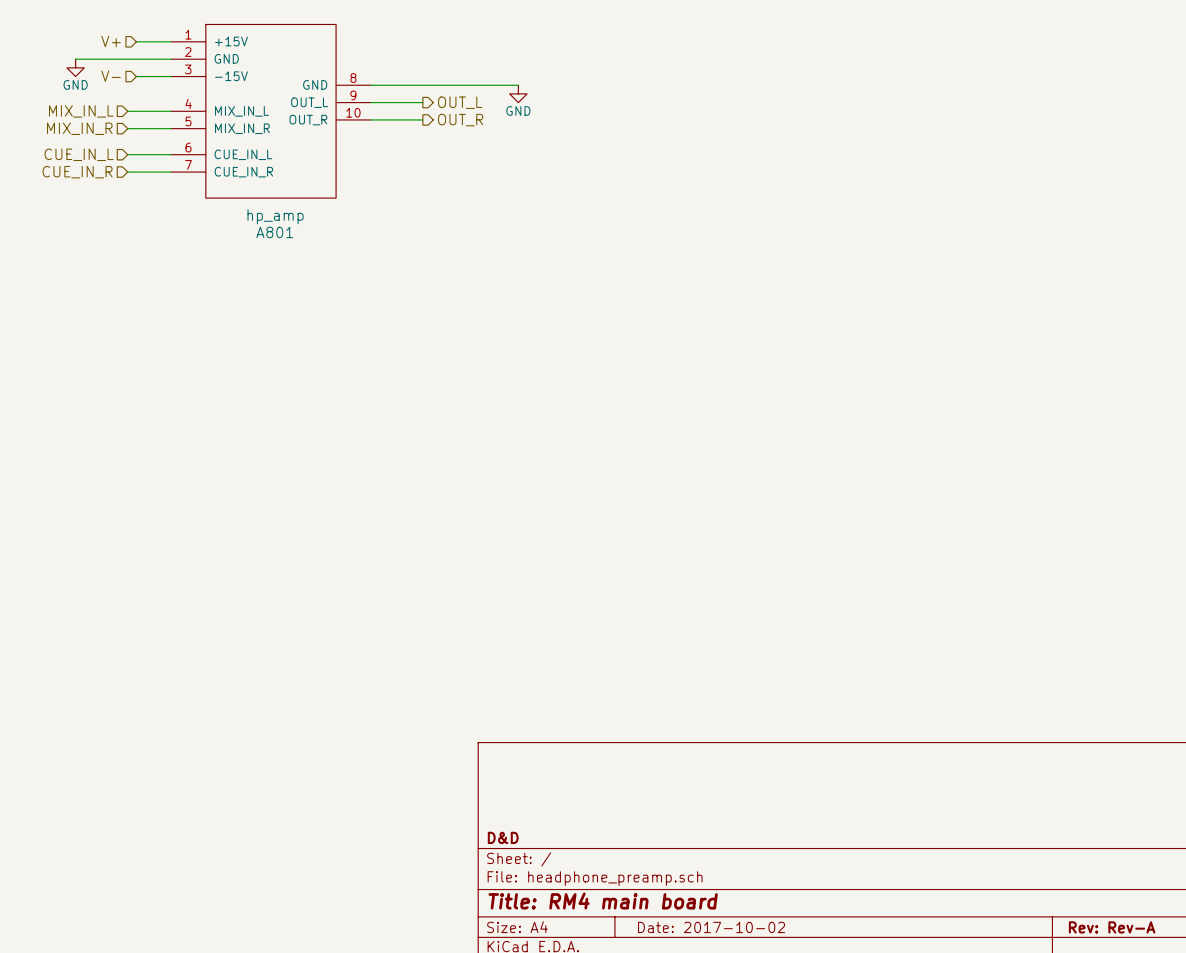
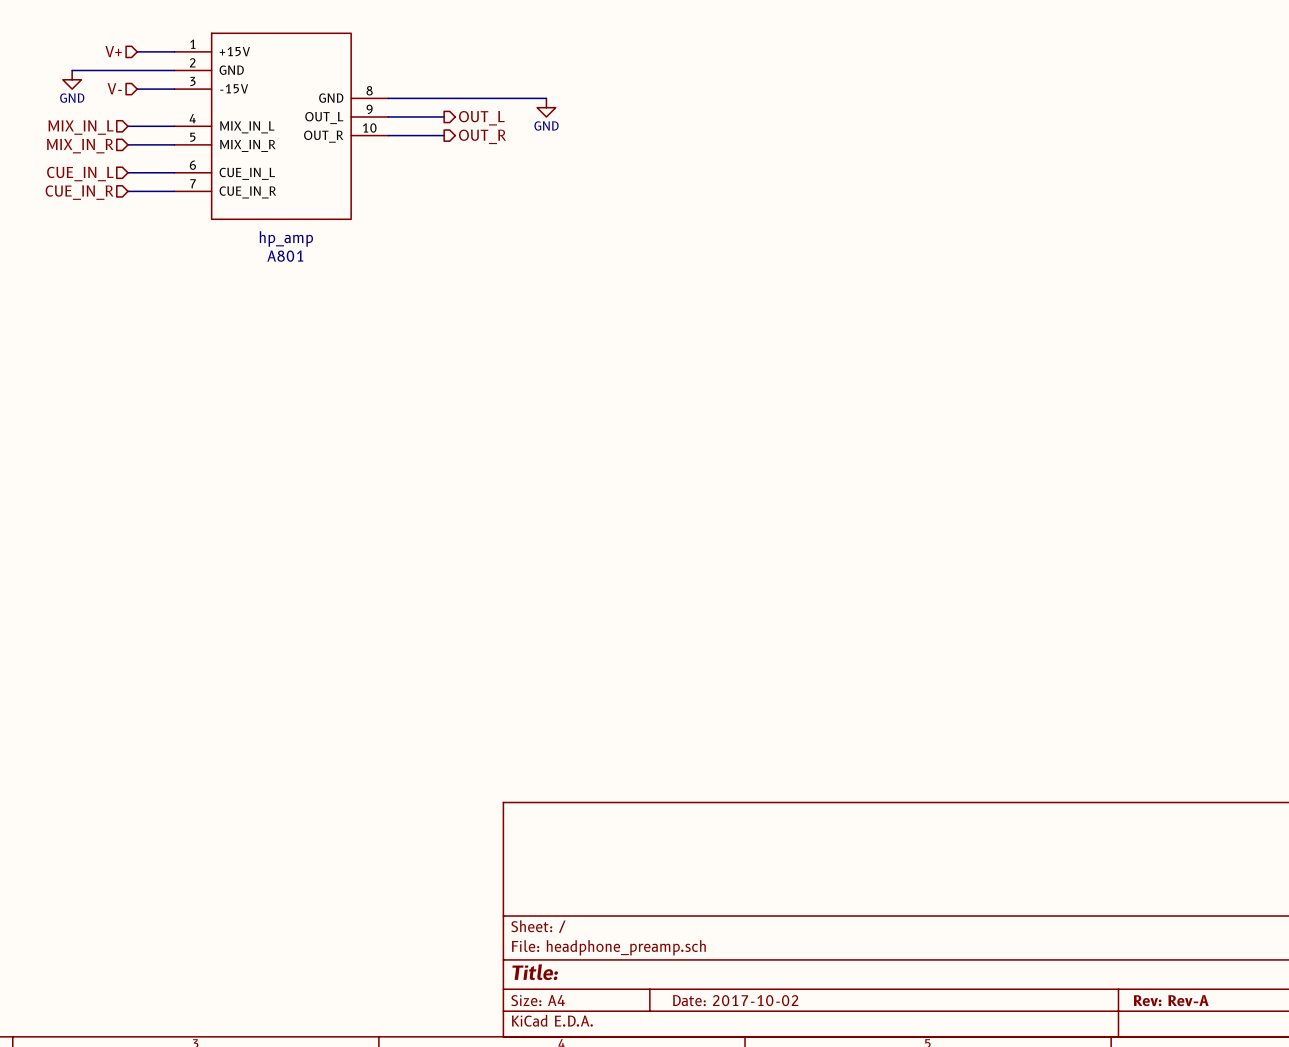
title block: D&D (503, 837) -> none
title block: Title: RM4 main board (603, 901) -> Title: (535, 972)

